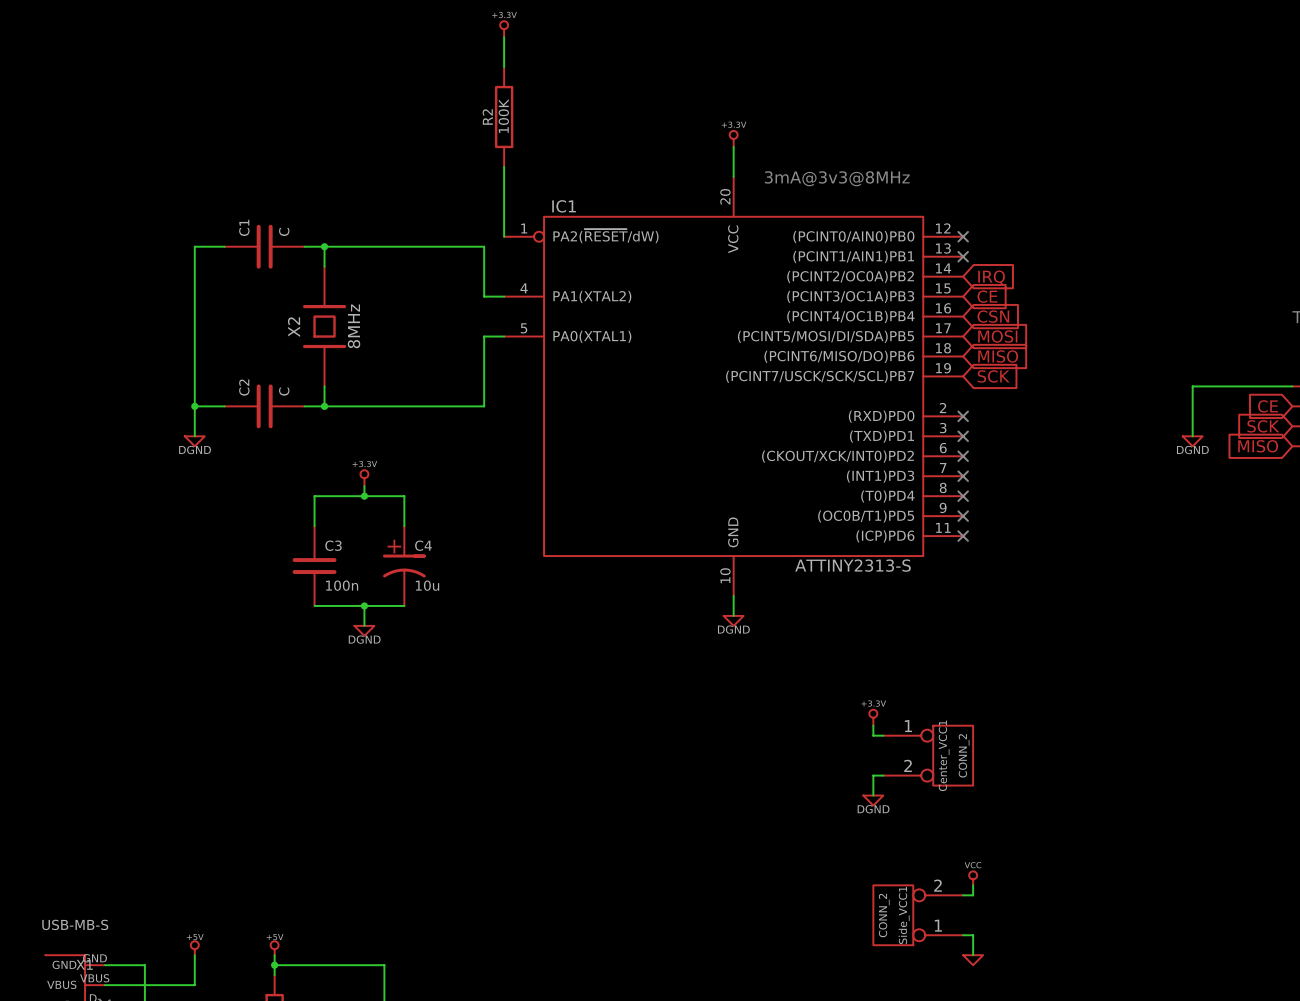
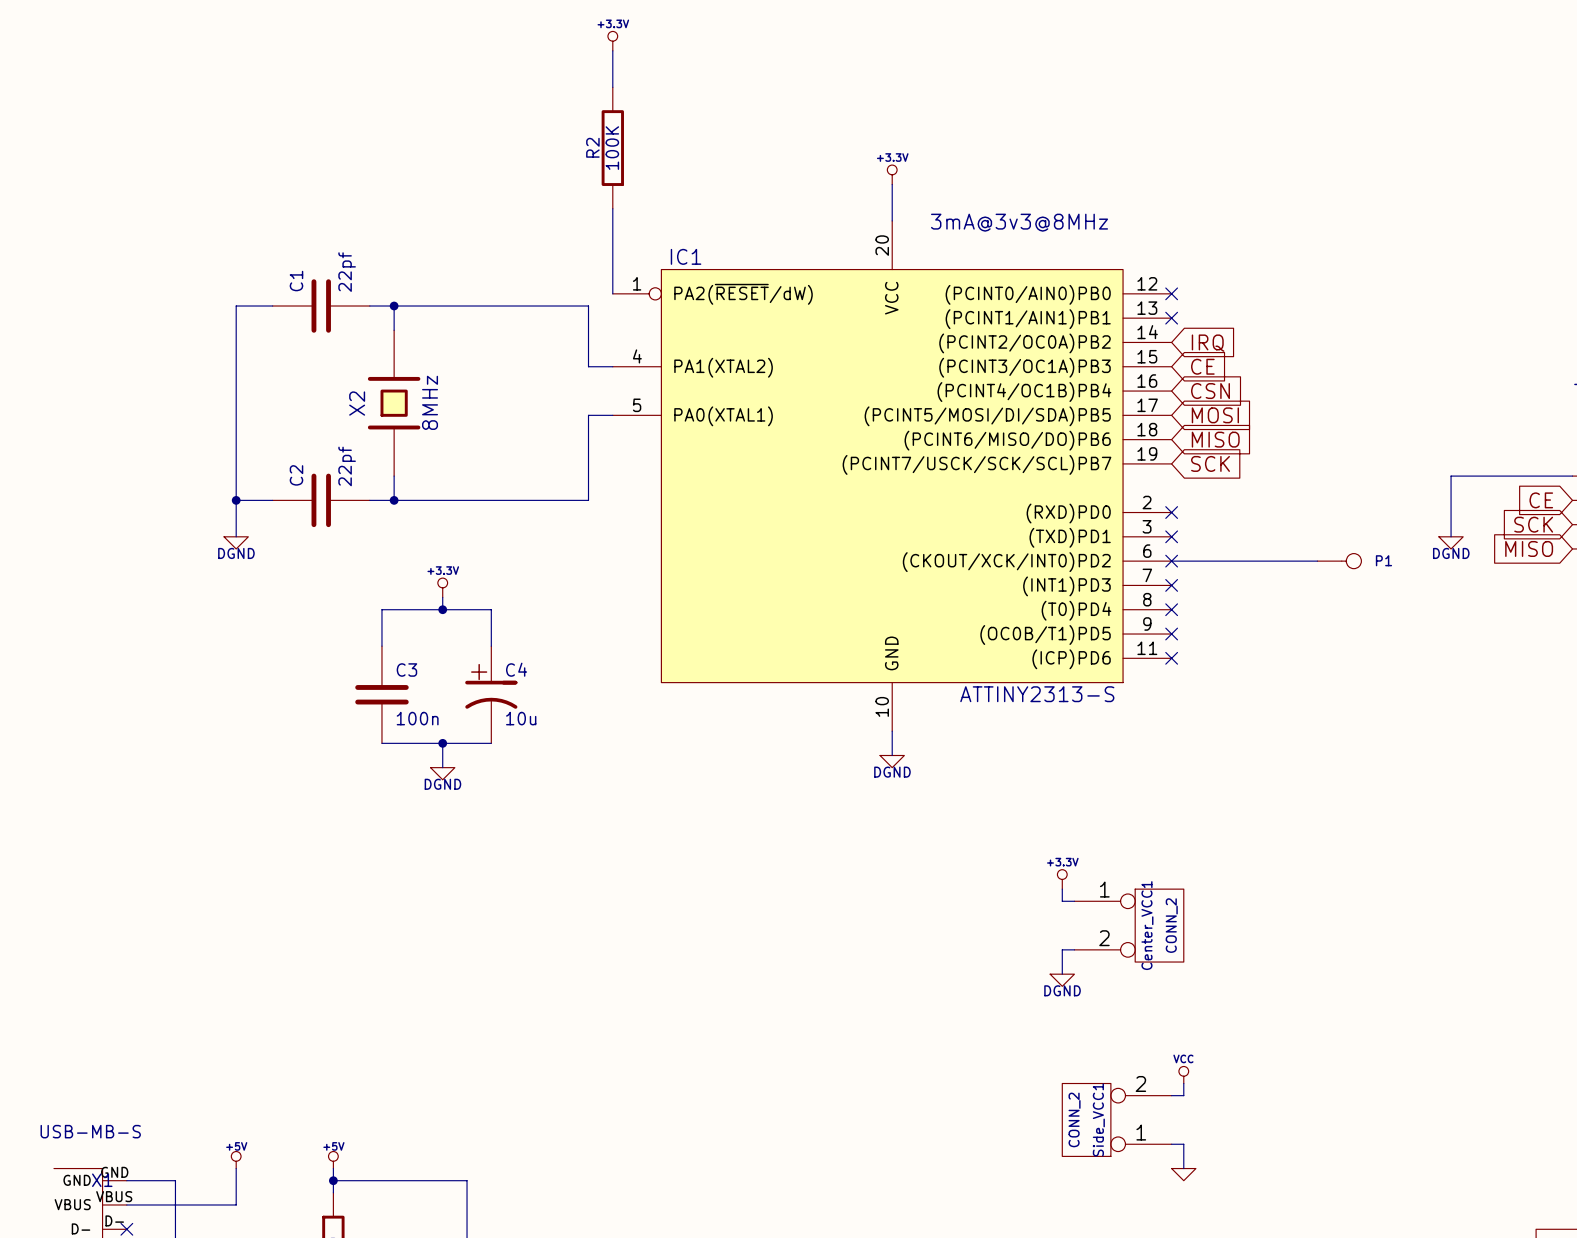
C1 value: C (284, 231) -> 22pf (347, 272)
C2 value: C (284, 391) -> 22pf (347, 466)
wire: none -> (1171, 561) (1317, 561)
P1: none -> (1339, 561)

